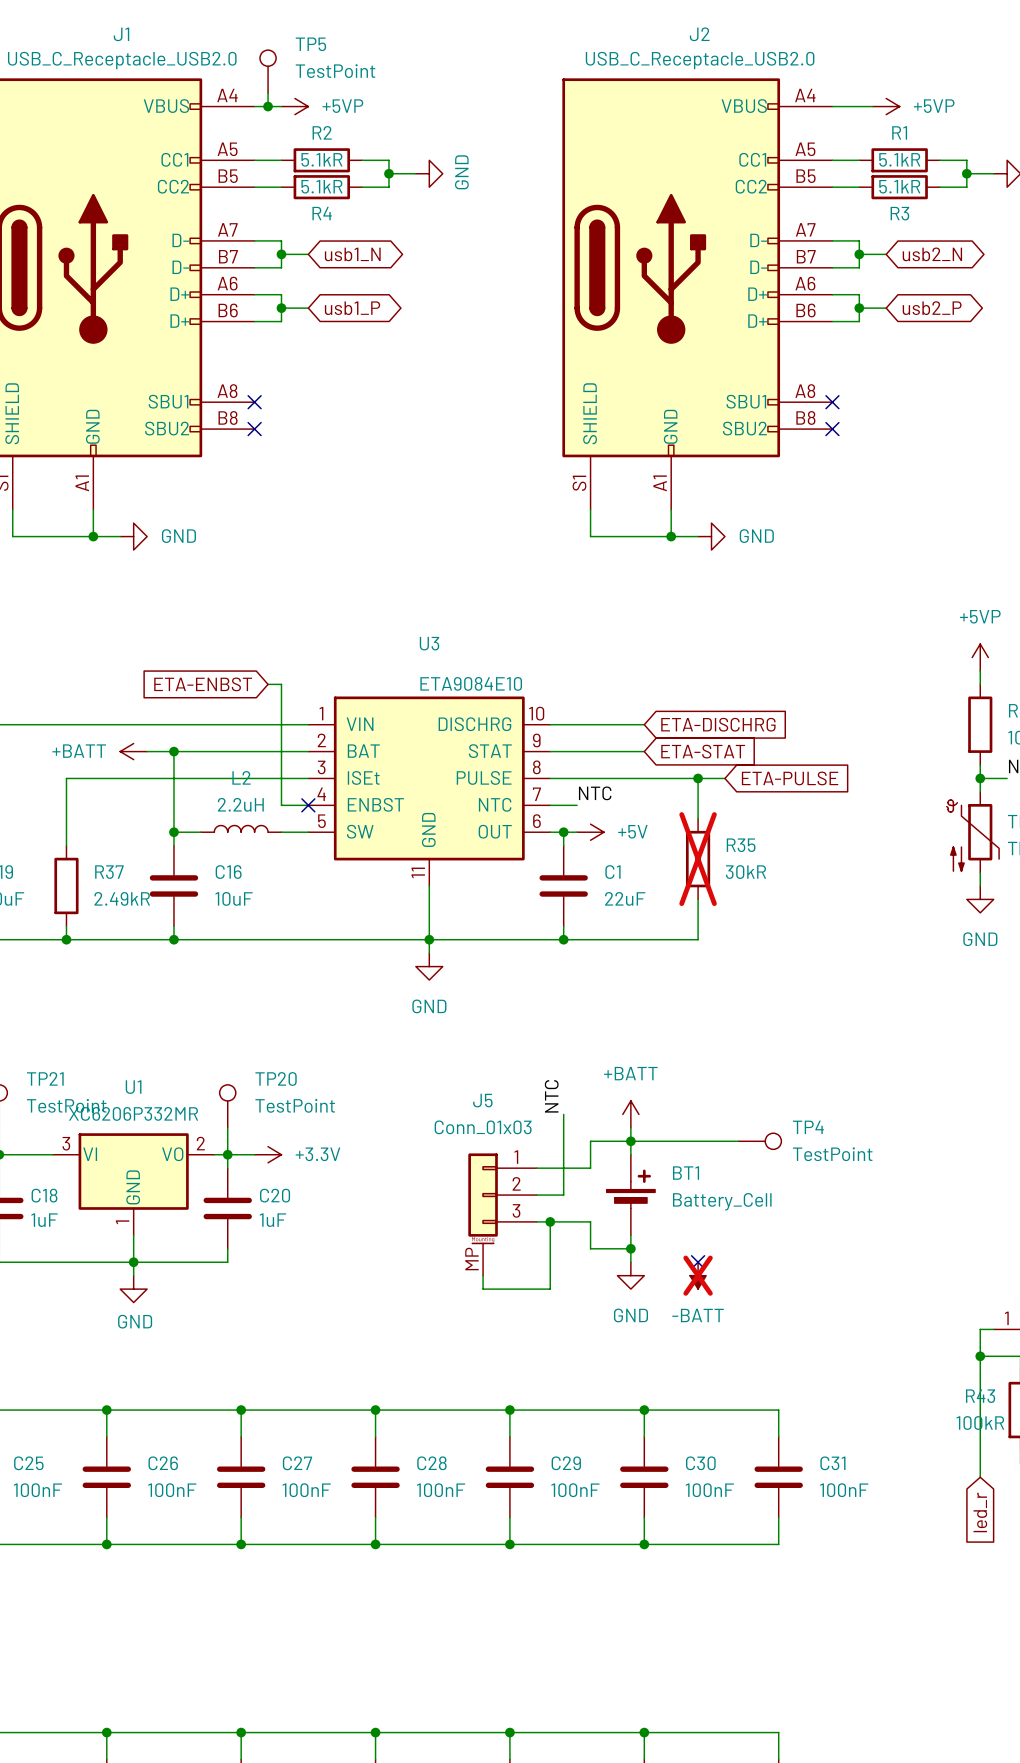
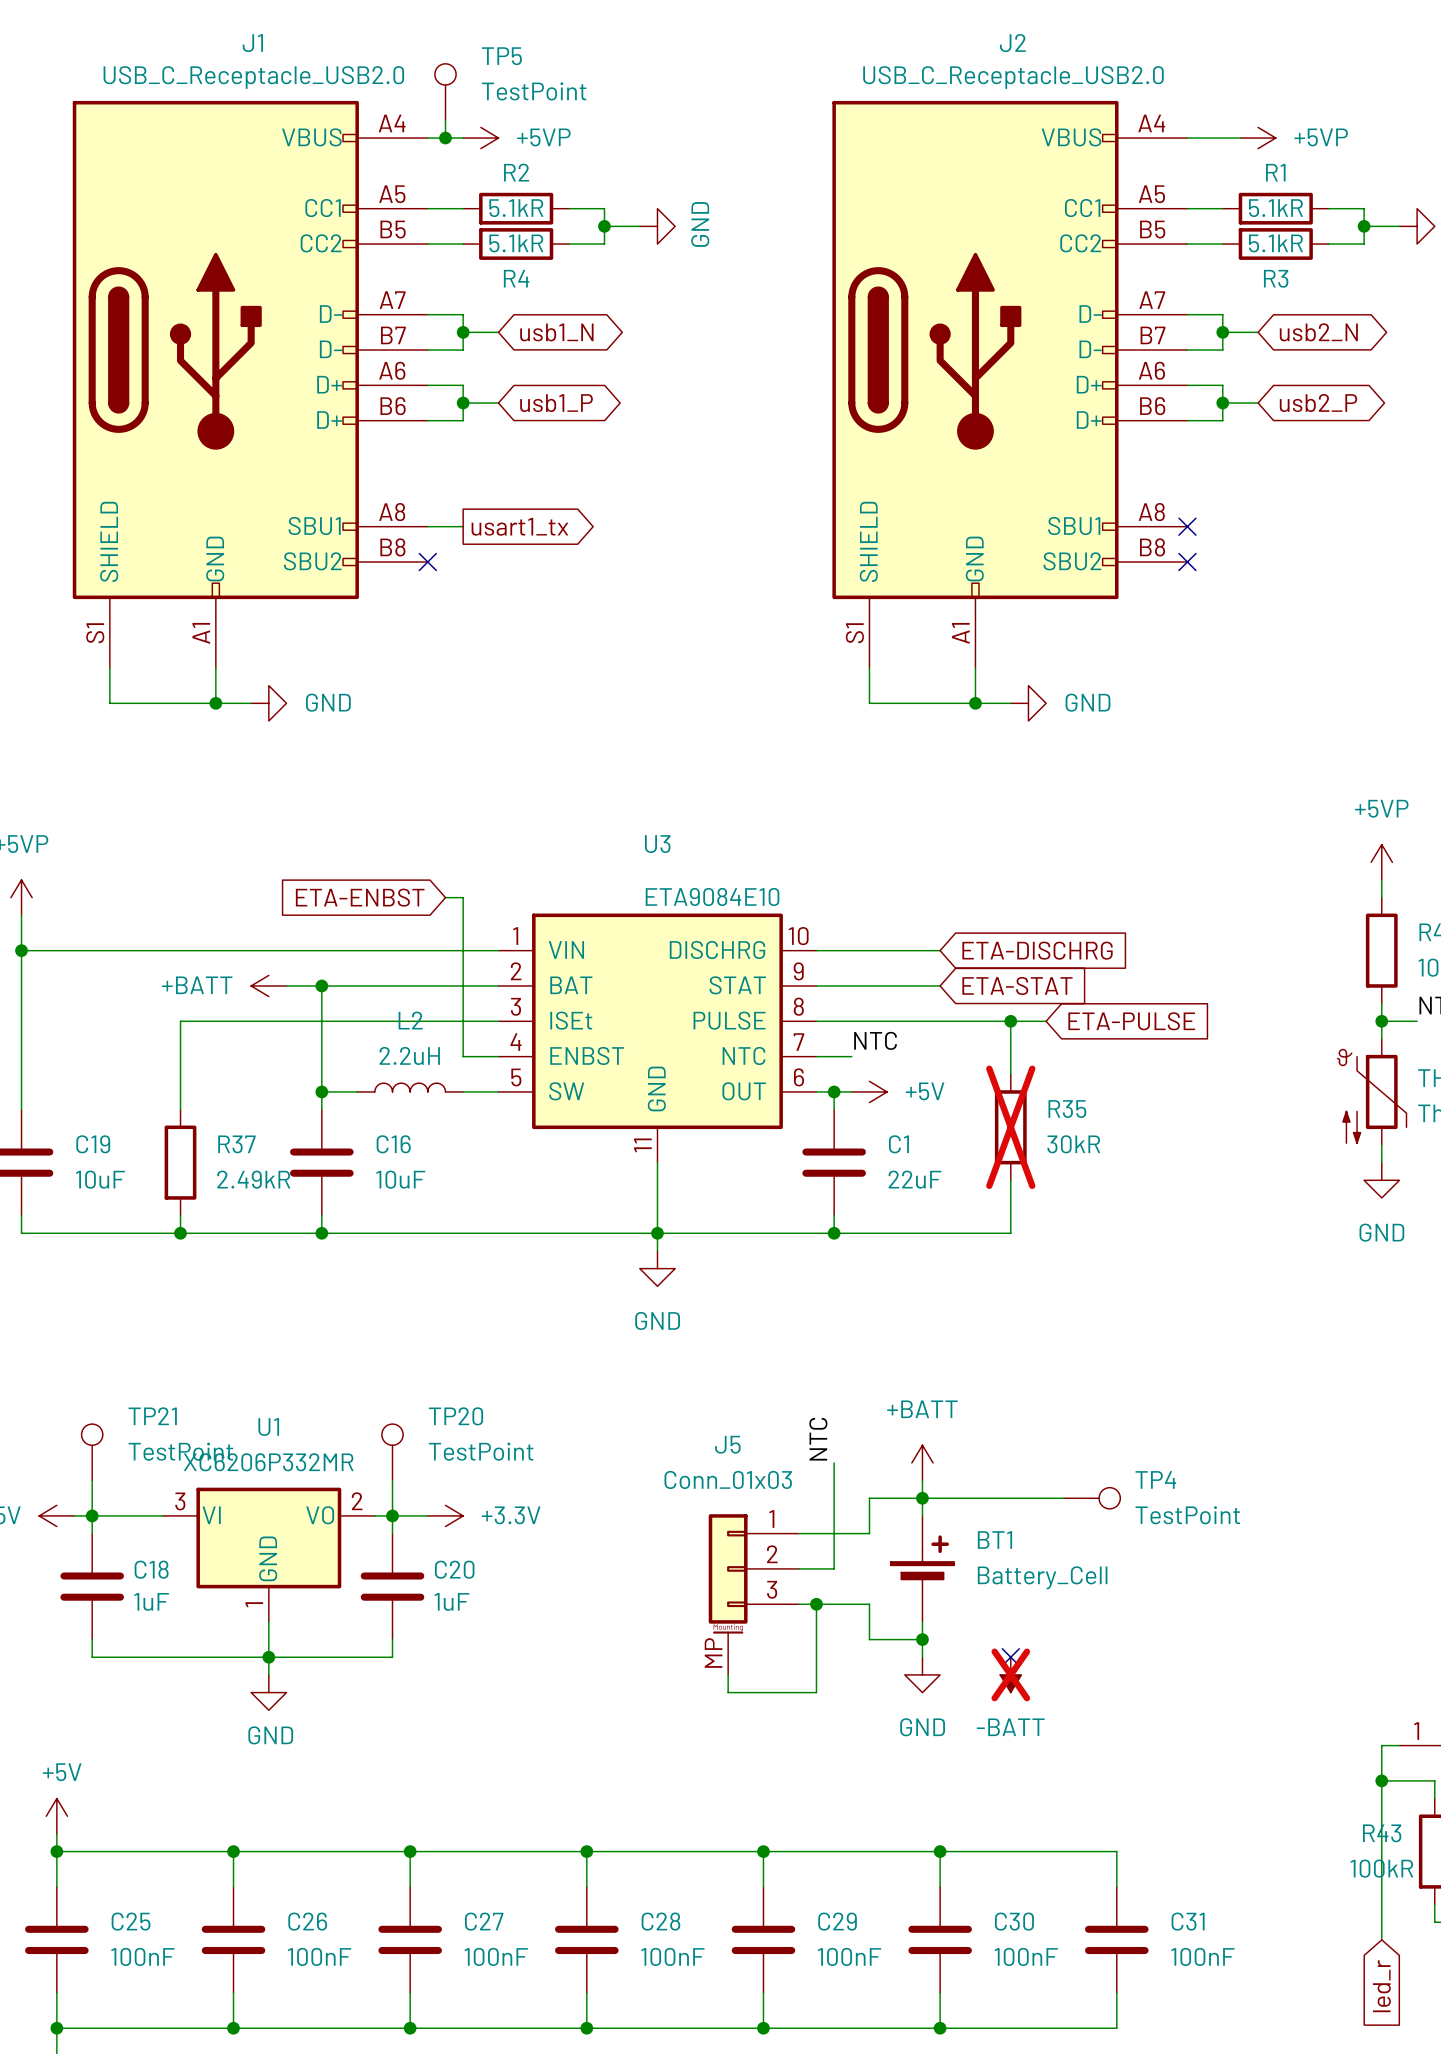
wire: none -> (427, 526) (463, 526)
no-connect mark: (254, 402) -> none
global label: none -> usart1_tx (519, 526)
no-connect mark: (308, 805) -> none

